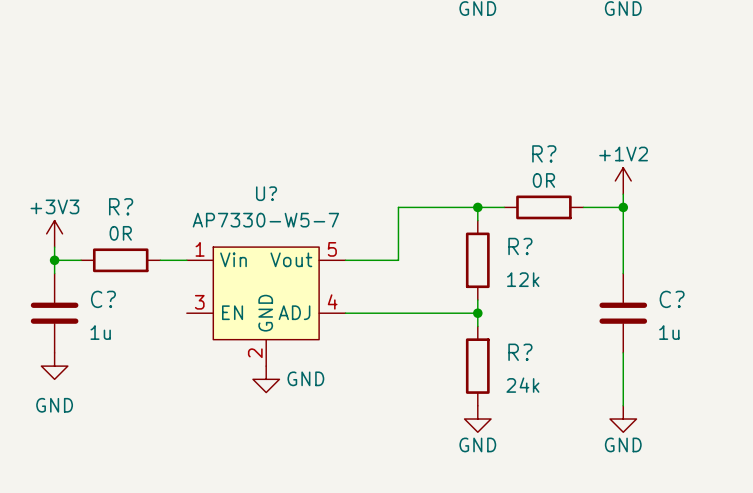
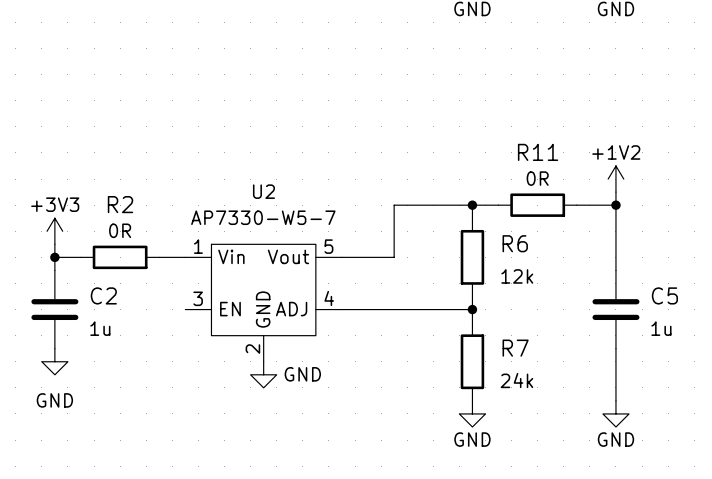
R? name: R? (544, 153) -> R11 (538, 152)
U? name: U? (266, 193) -> U2 (263, 191)
R? name: R? (121, 206) -> R2 (120, 204)
R? name: R? (520, 246) -> R6 (515, 243)
C? name: C? (103, 299) -> C2 (103, 295)
C? name: C? (672, 299) -> C5 (664, 295)
R? name: R? (520, 352) -> R7 (515, 348)

